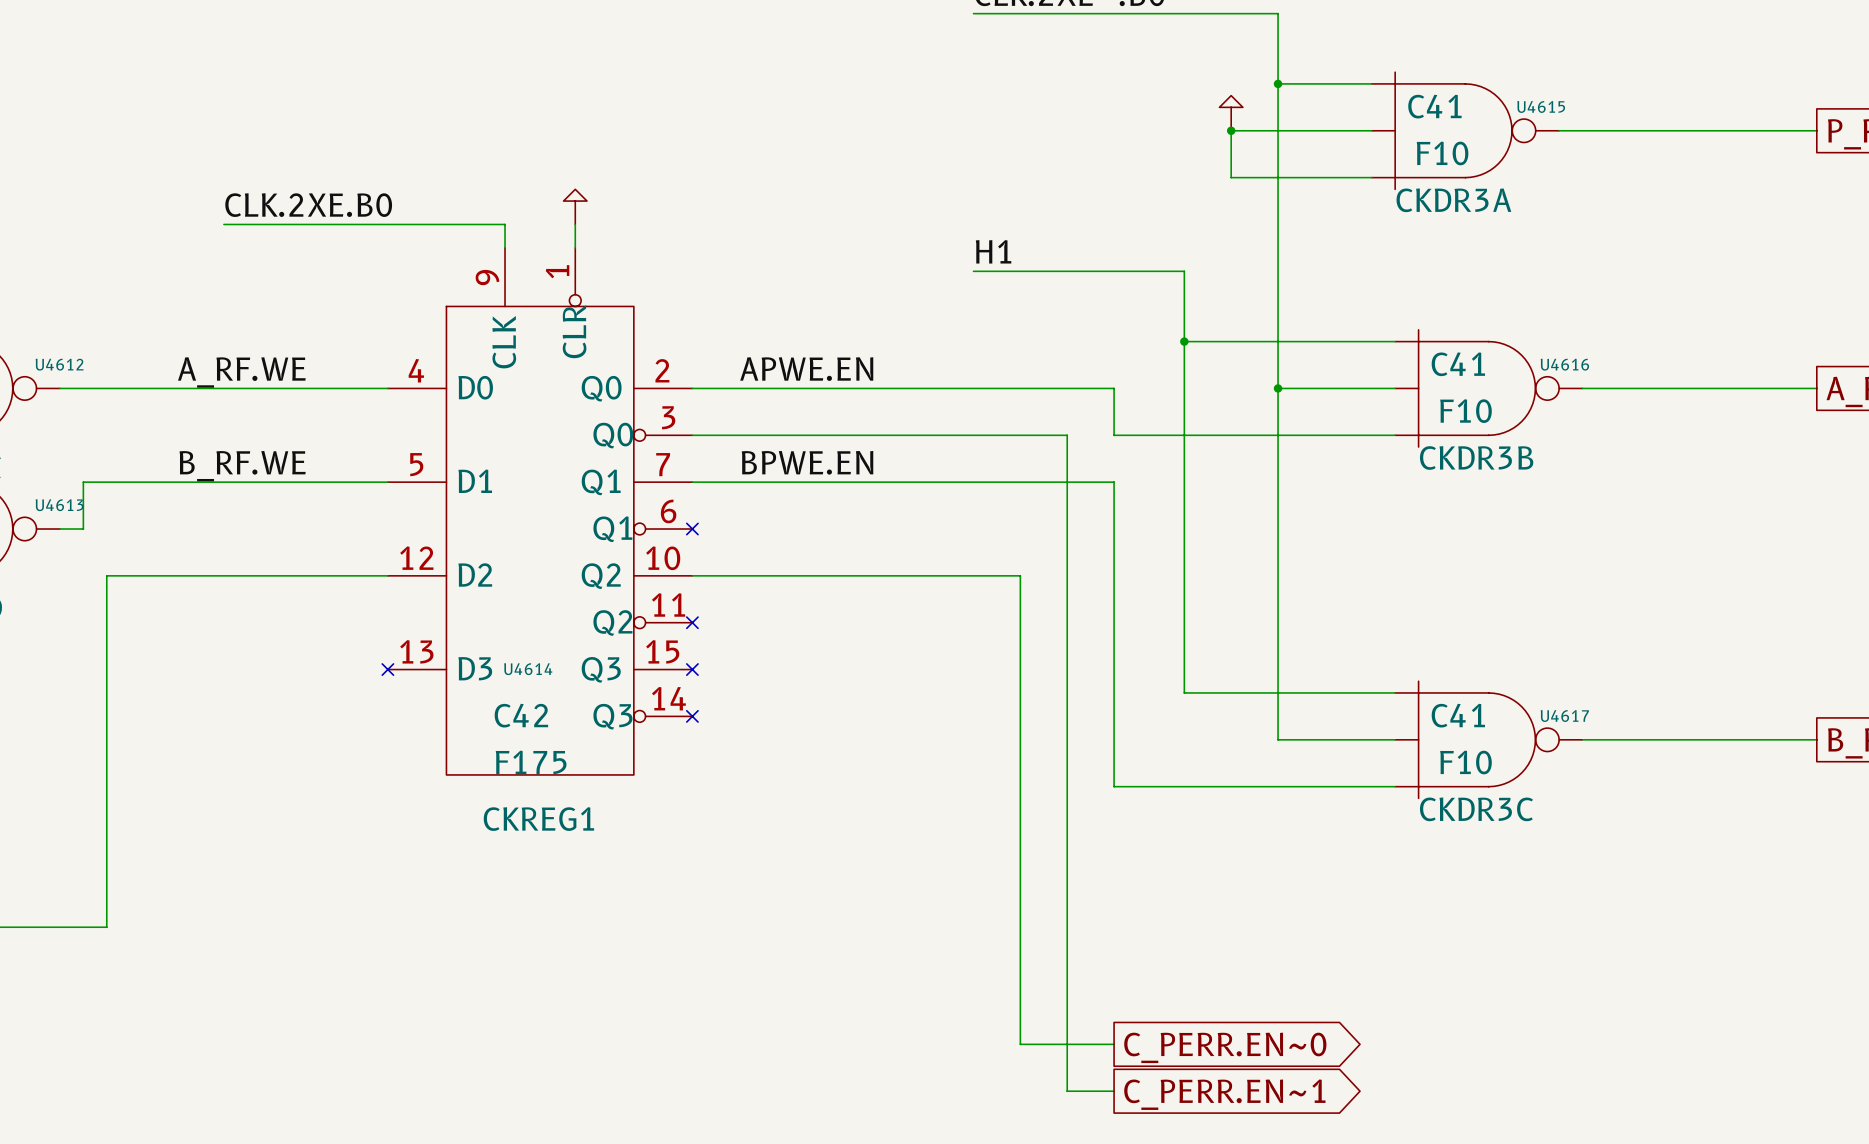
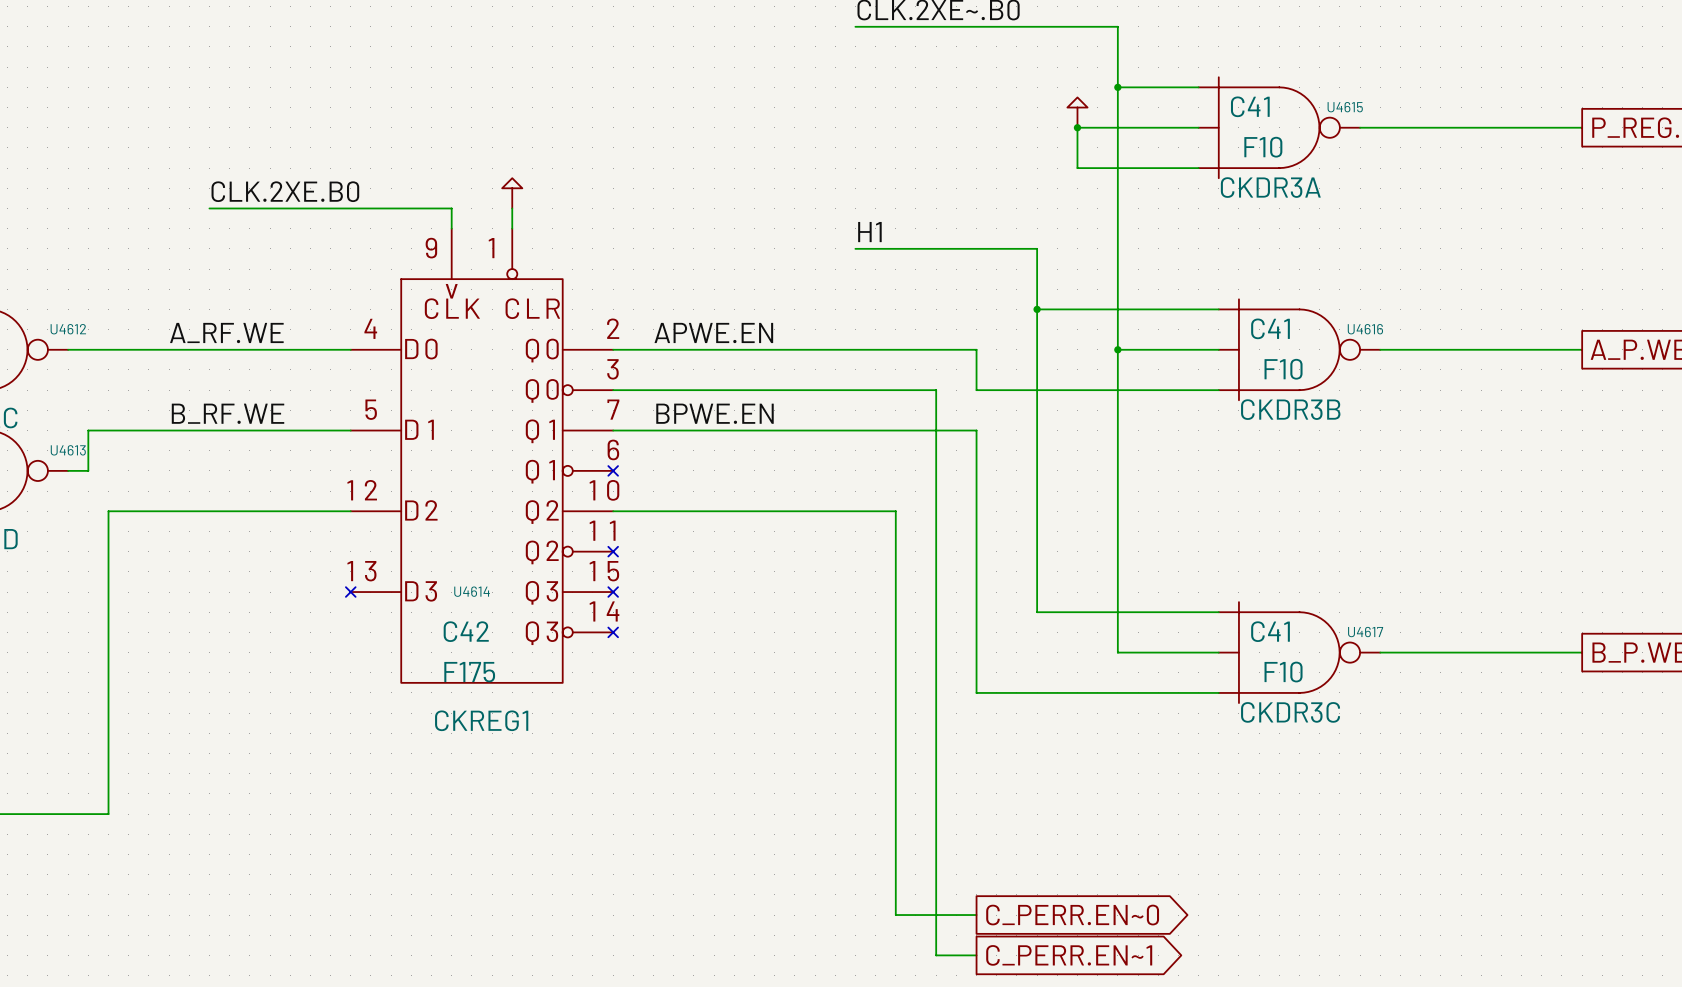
U4614 symbol: [387, 247, 693, 775] -> [350, 228, 614, 683]

